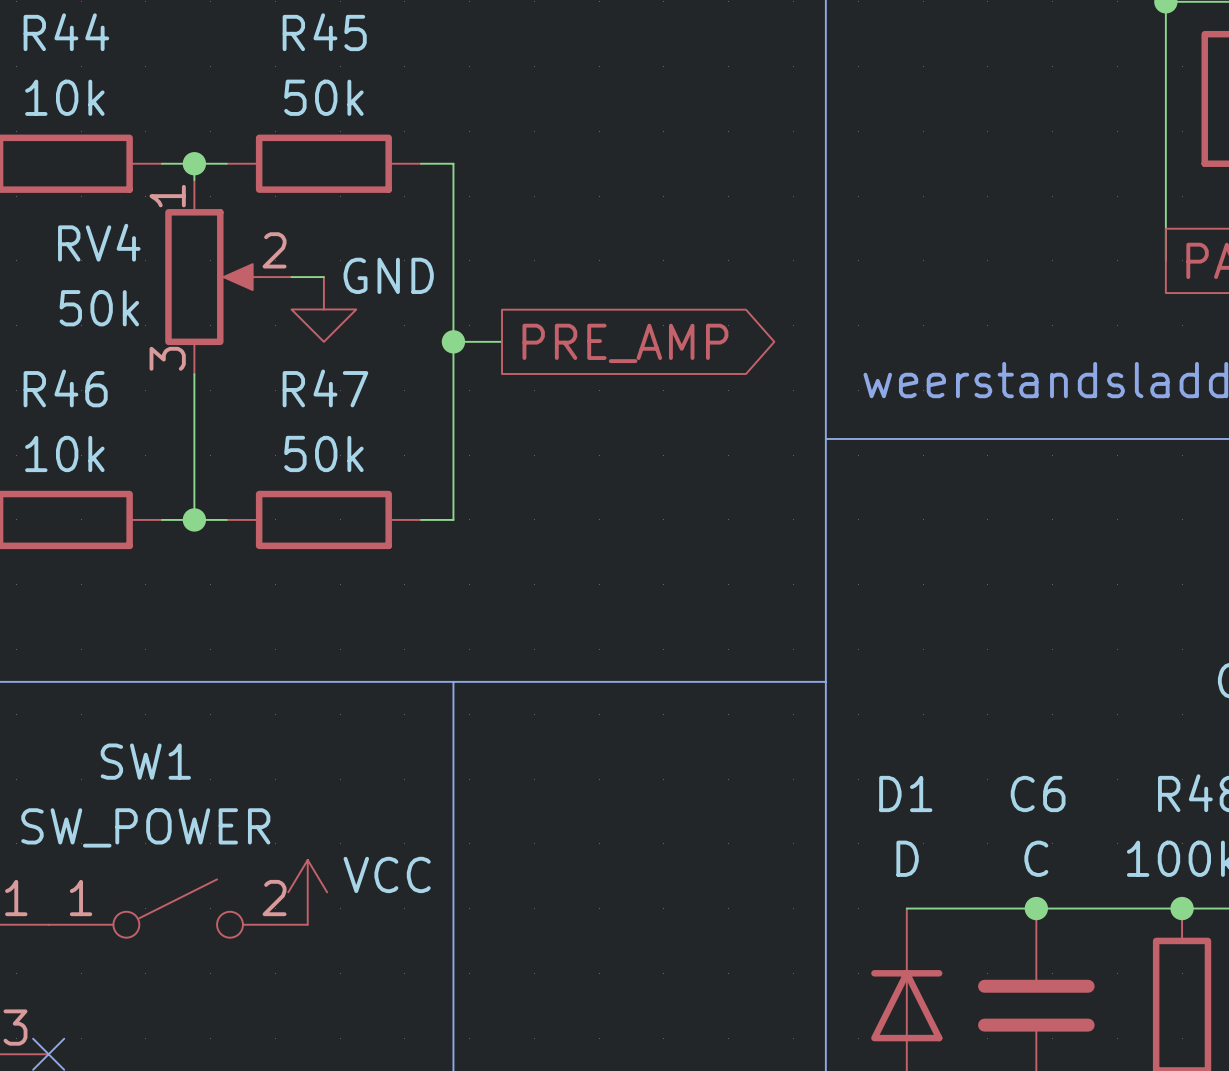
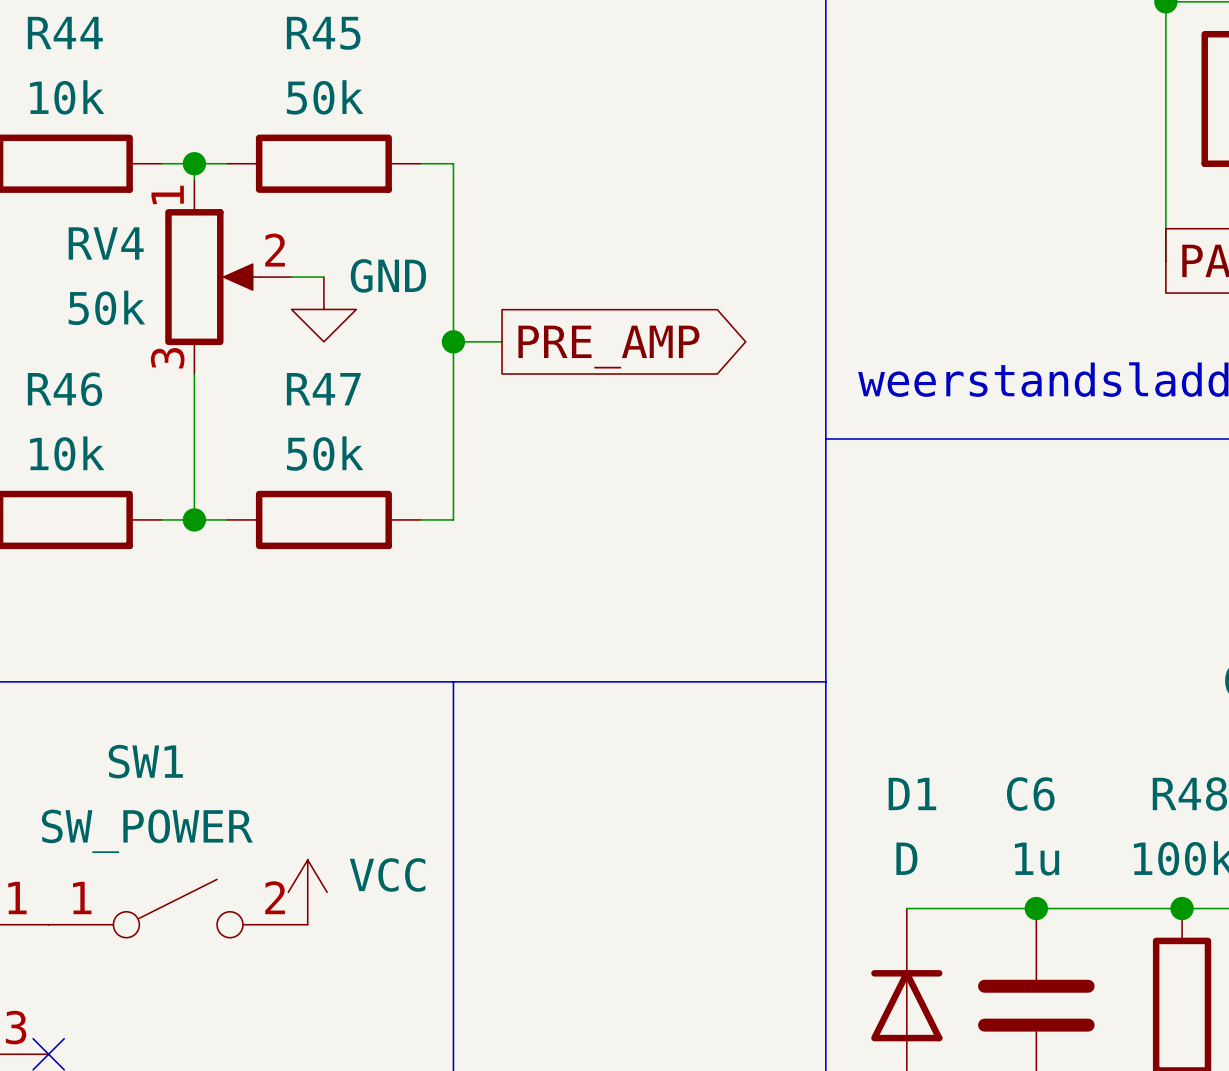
C6 value: C (1036, 858) -> 1u (1037, 859)

